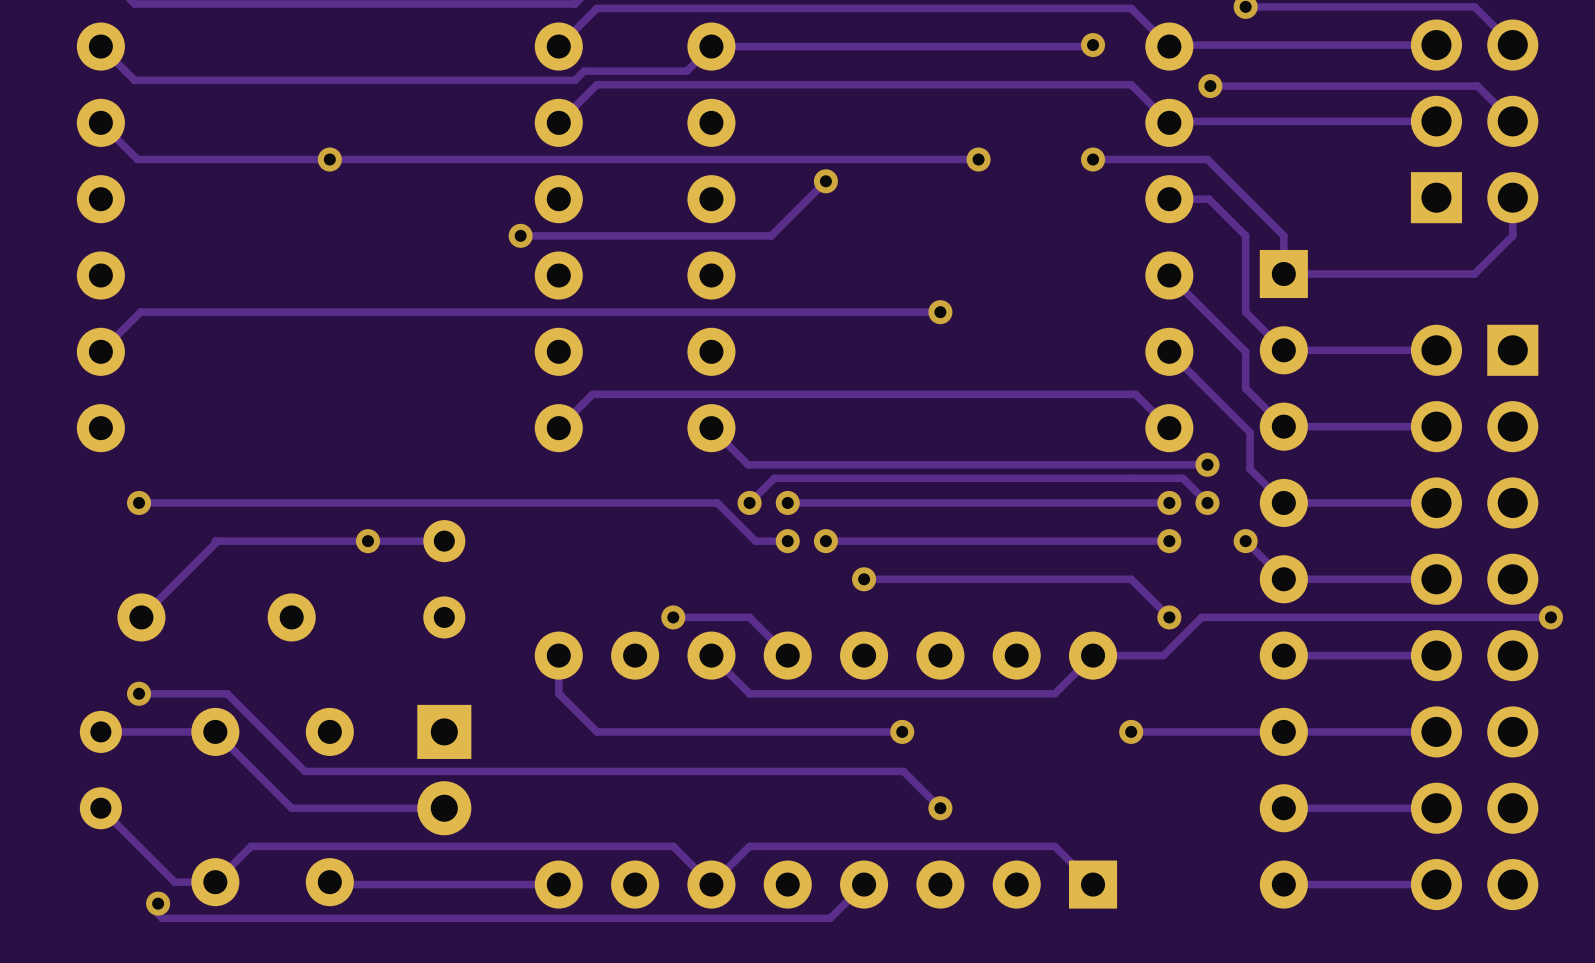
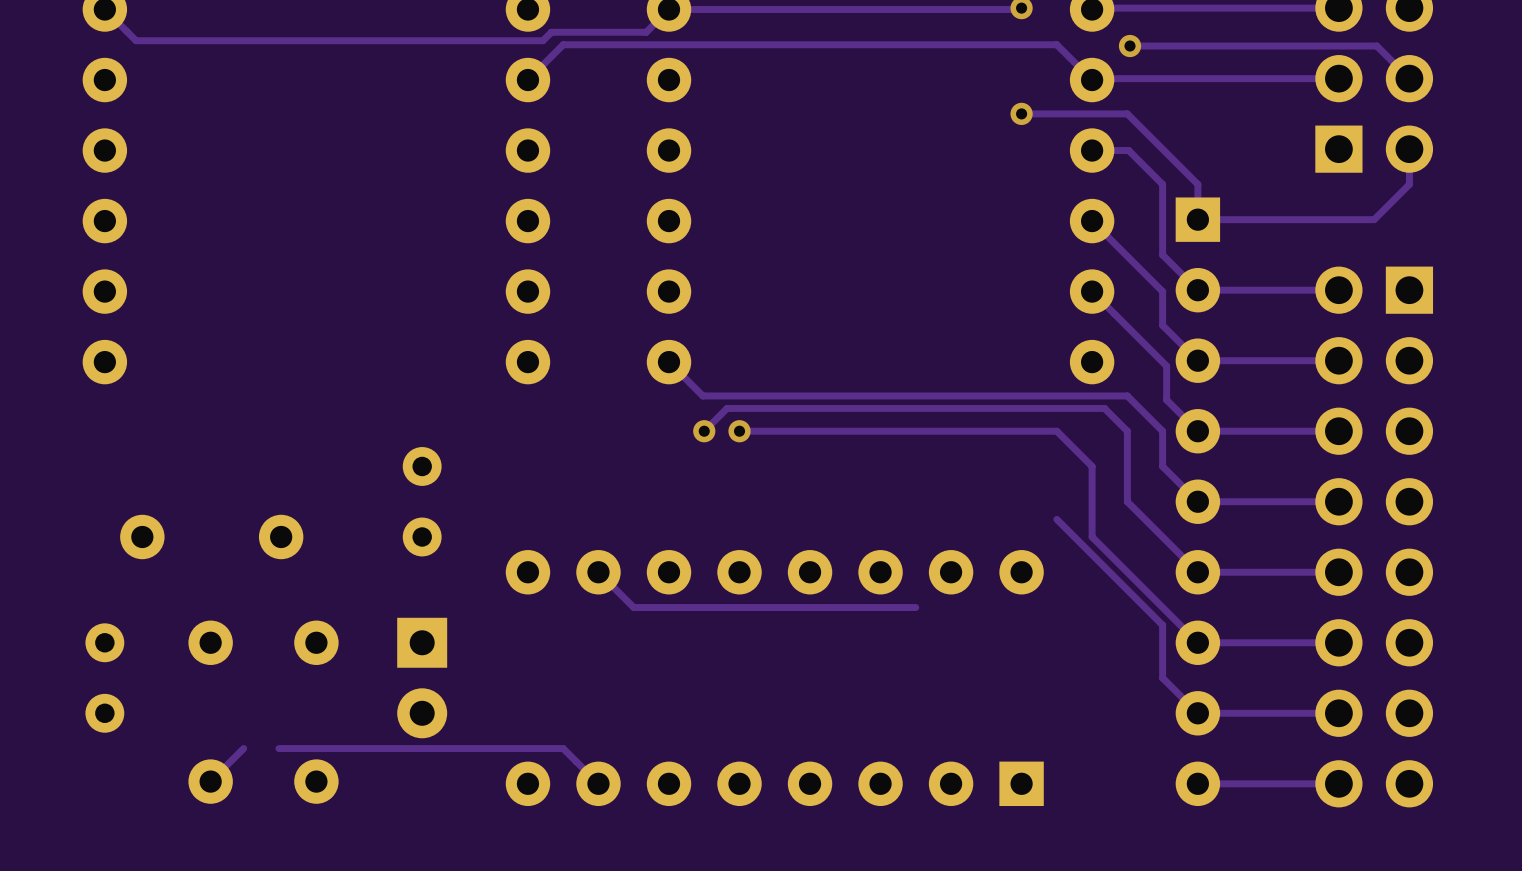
track: (100, 122) (137, 159) (978, 159) -> none
via: (329, 159) -> none
via: (978, 159) -> none
track: (825, 181) (771, 235) (520, 235) -> none
via: (825, 181) -> none
via: (520, 235) -> none
track: (940, 312) (140, 312) (100, 351) -> none
via: (940, 312) -> none
track: (1169, 428) (1135, 394) (592, 394) (558, 428) -> none
track: none -> (1127, 395) (1162, 431) (1162, 466)
via: (1207, 464) -> none
track: (139, 502) (717, 502) (755, 541) (787, 541) -> none
via: (139, 502) -> none
track: (1169, 502) (1131, 502) -> none
via: (1169, 502) -> none
track: none -> (1127, 431) (1127, 501) (1197, 572)
via: (1207, 502) -> none
via: (368, 541) -> none
track: (444, 541) (215, 541) (215, 543) (141, 617) -> none
via: (787, 541) -> none
via: (825, 541) -> none
track: (1169, 541) (825, 541) -> none
via: (1169, 541) -> none
via: (1245, 541) -> none
track: (864, 579) (1131, 579) (1169, 617) -> none
via: (864, 579) -> none
track: none -> (1056, 519) (1162, 625) (1162, 678) (1197, 713)
track: (673, 617) (749, 617) (787, 655) -> none
via: (673, 617) -> none
via: (1169, 617) -> none
track: (1550, 617) (1201, 617) (1163, 655) (1093, 655) (1054, 693) (978, 693) -> none
via: (1550, 617) -> none
track: (558, 655) (558, 693) (596, 731) (902, 731) -> none
track: (711, 655) (749, 693) -> (598, 572) (633, 607) (704, 607)
track: (139, 693) (227, 693) (304, 771) (903, 771) (940, 808) -> none
via: (139, 693) -> none
track: (100, 731) (215, 731) (291, 808) (444, 808) -> none
via: (902, 731) -> none
via: (1131, 731) -> none
track: (1283, 731) (1131, 731) -> (1197, 642) (1092, 537) (1092, 466) (1056, 431)
track: (100, 808) (174, 882) (215, 882) -> none
via: (940, 808) -> none
track: (289, 846) (251, 846) -> none
track: (596, 846) (673, 846) (711, 884) (749, 846) (1054, 846) (1093, 884) -> (563, 748) (598, 783)
track: (329, 882) (332, 884) (558, 884) -> none
track: (864, 884) (830, 918) (162, 918) (158, 914) (158, 903) -> none
via: (158, 903) -> none

